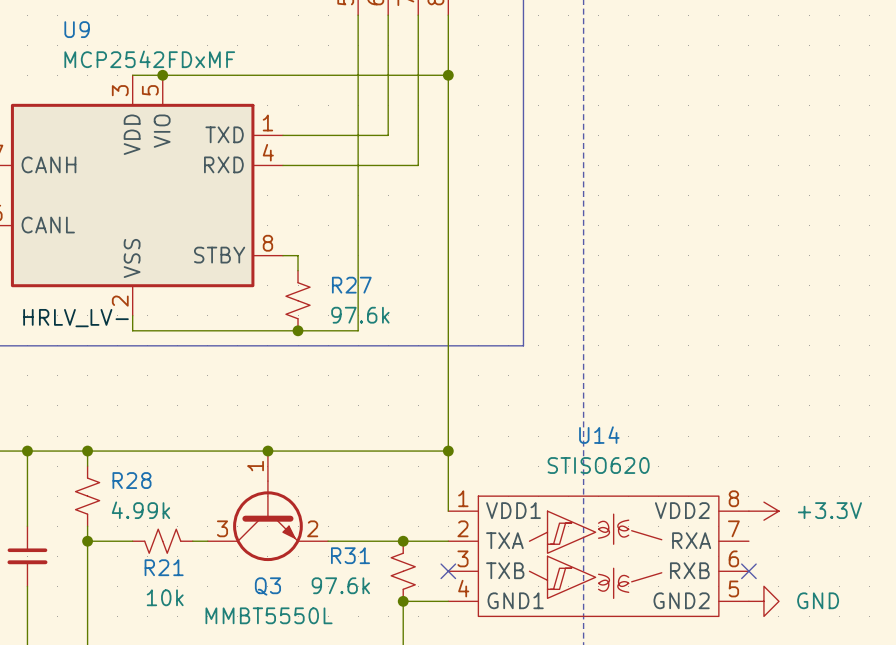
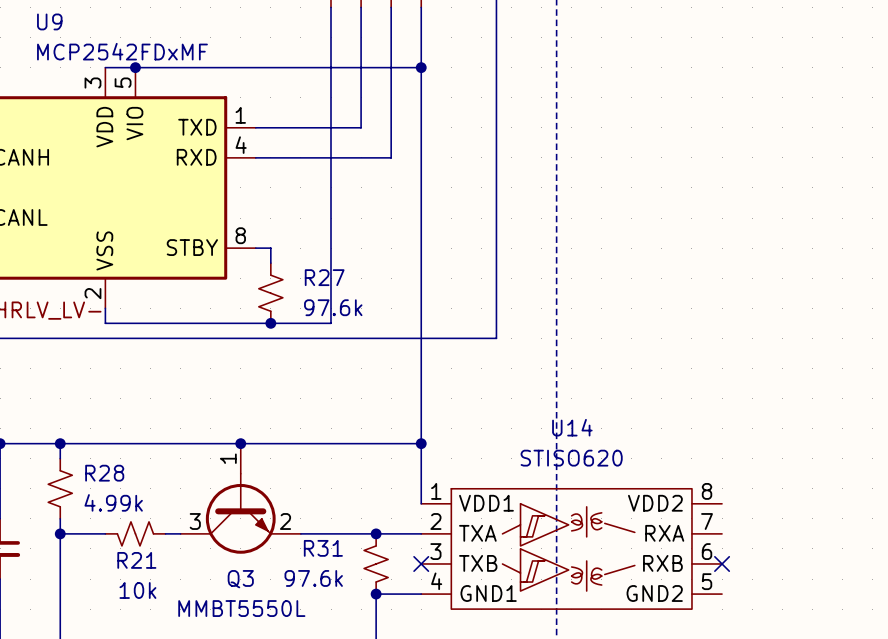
power symbol: +3.3V (763, 511) -> none
power symbol: GND (763, 601) -> none

